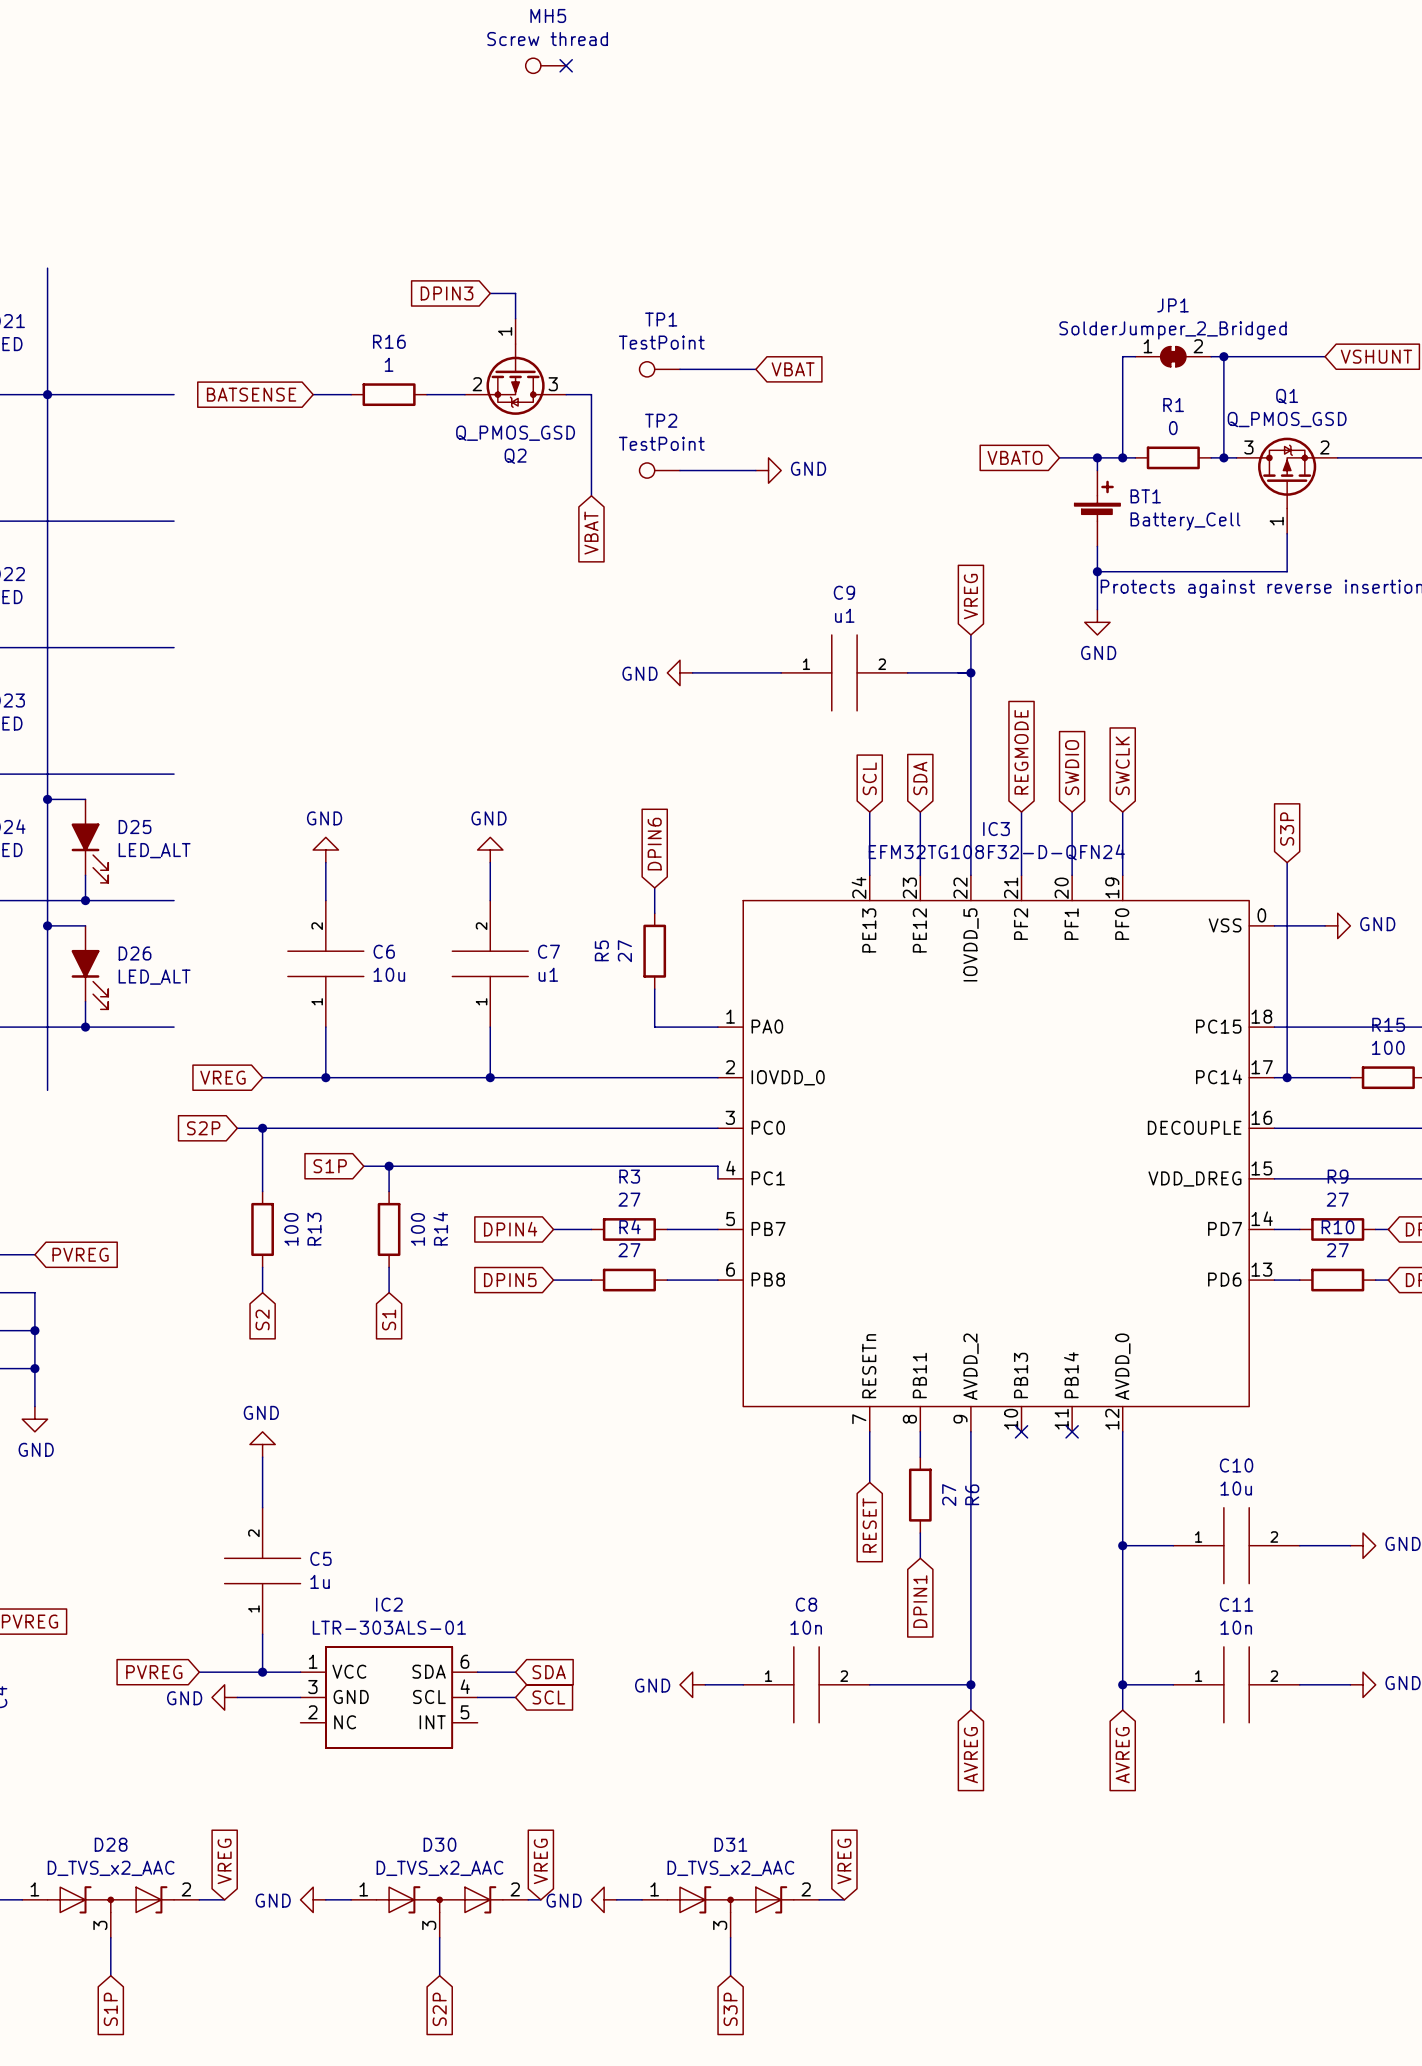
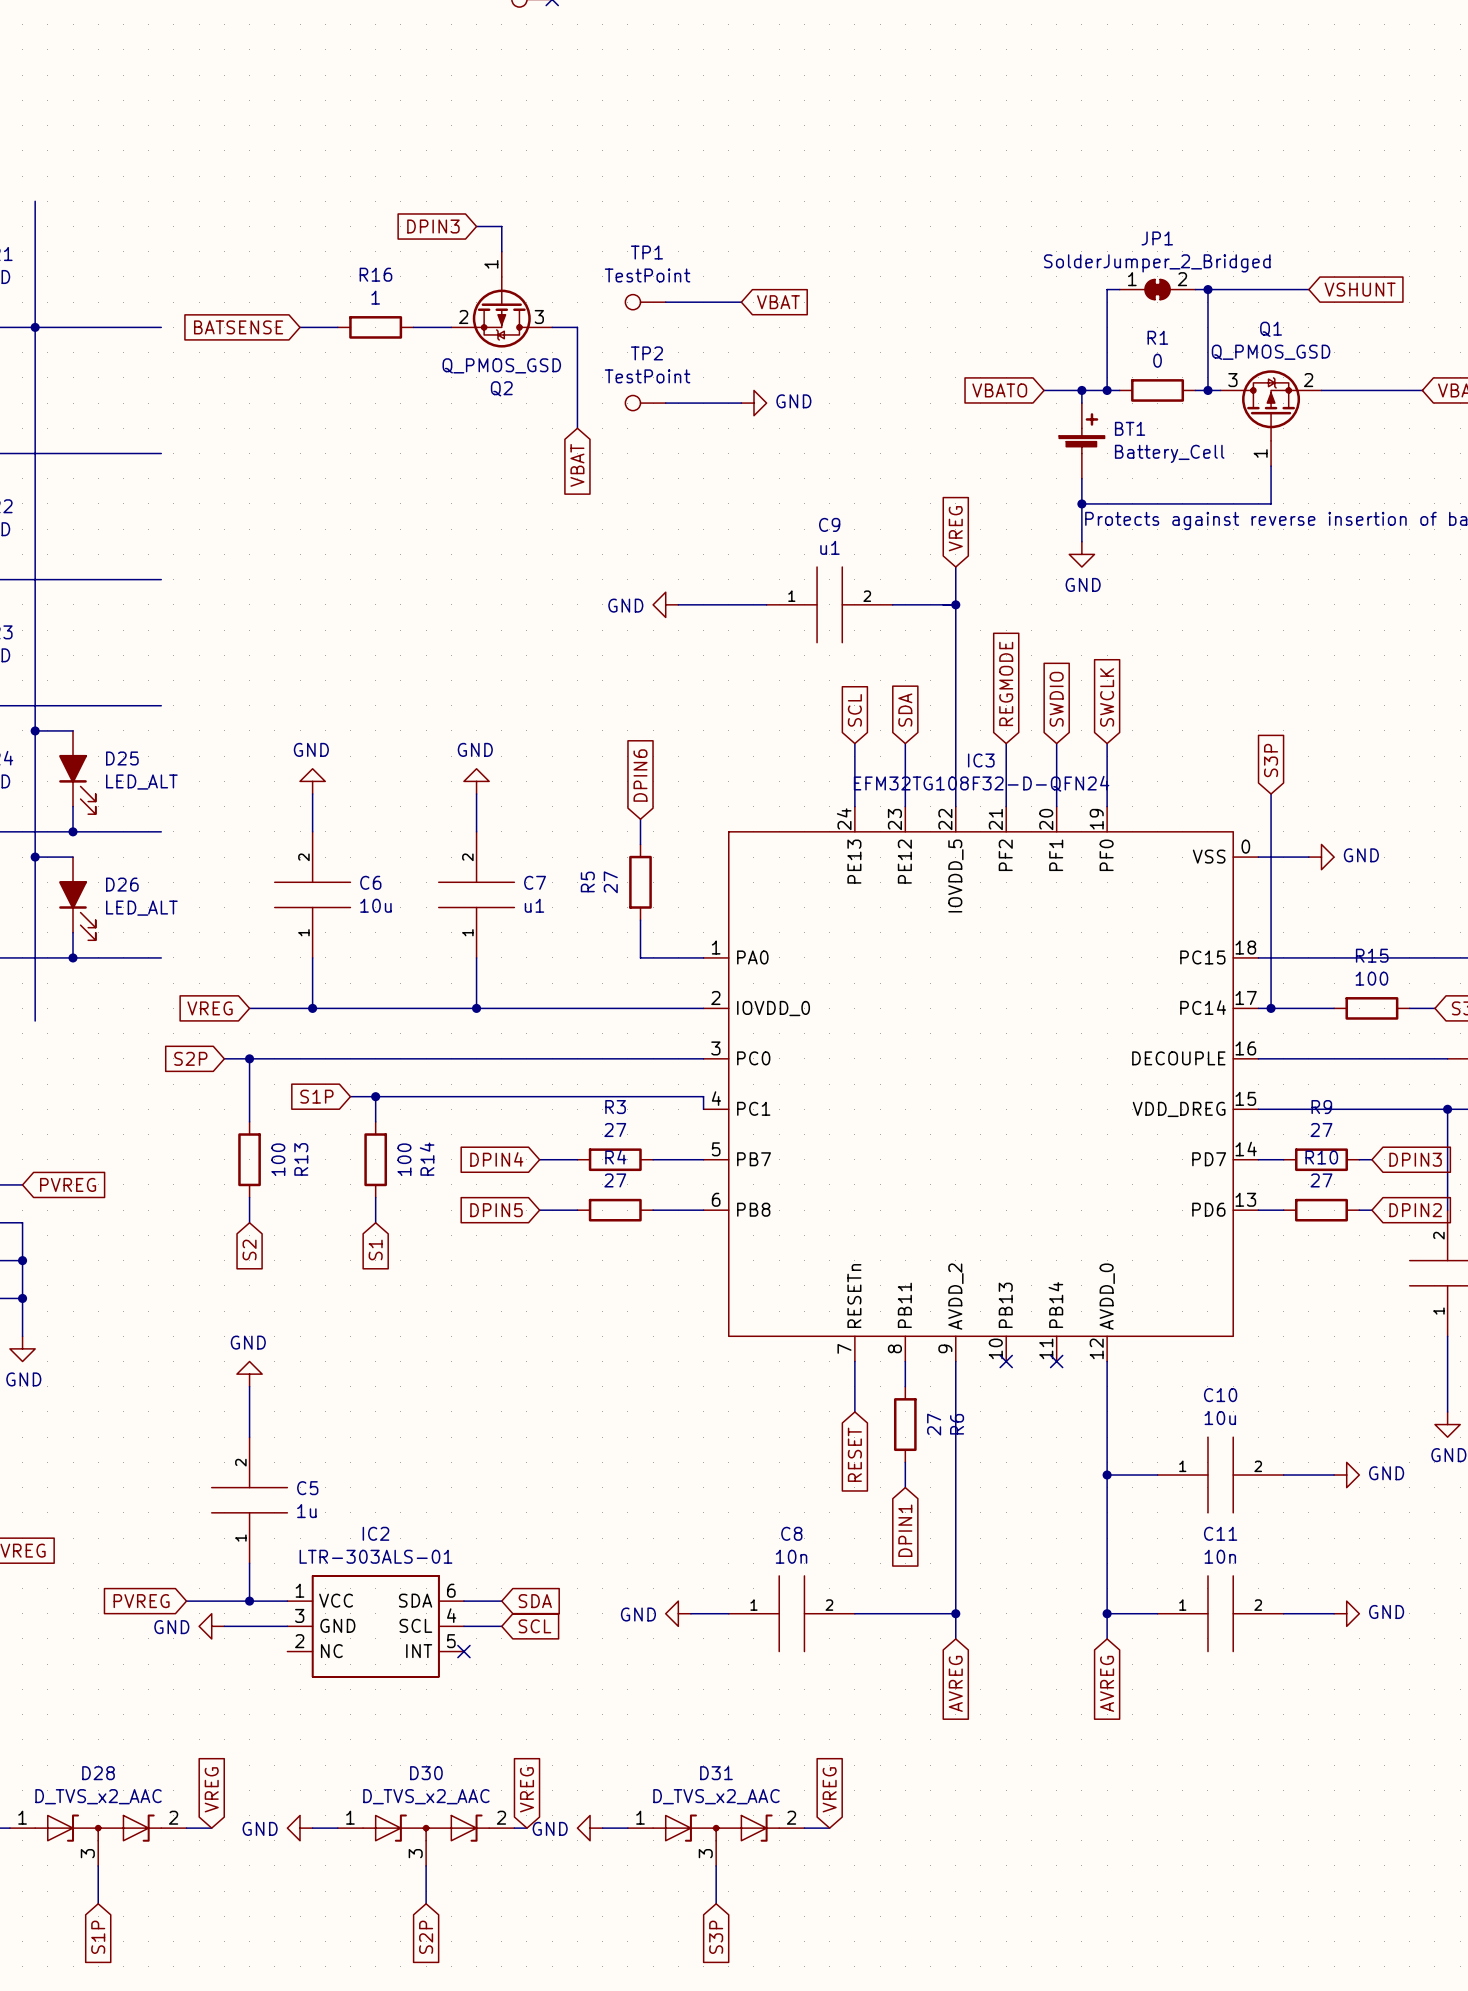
no-connect mark: none -> (463, 1651)

